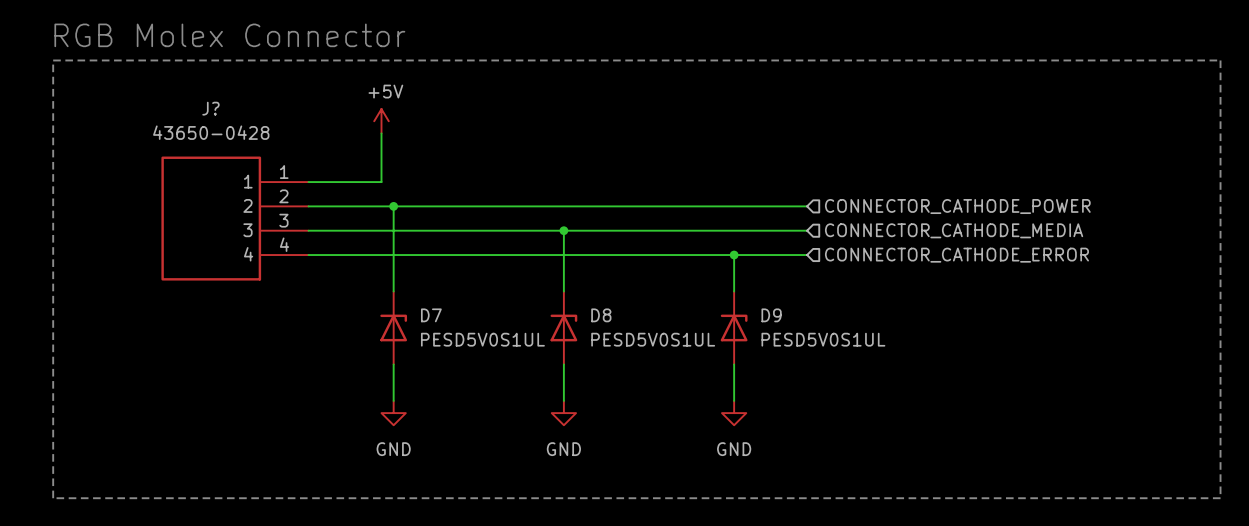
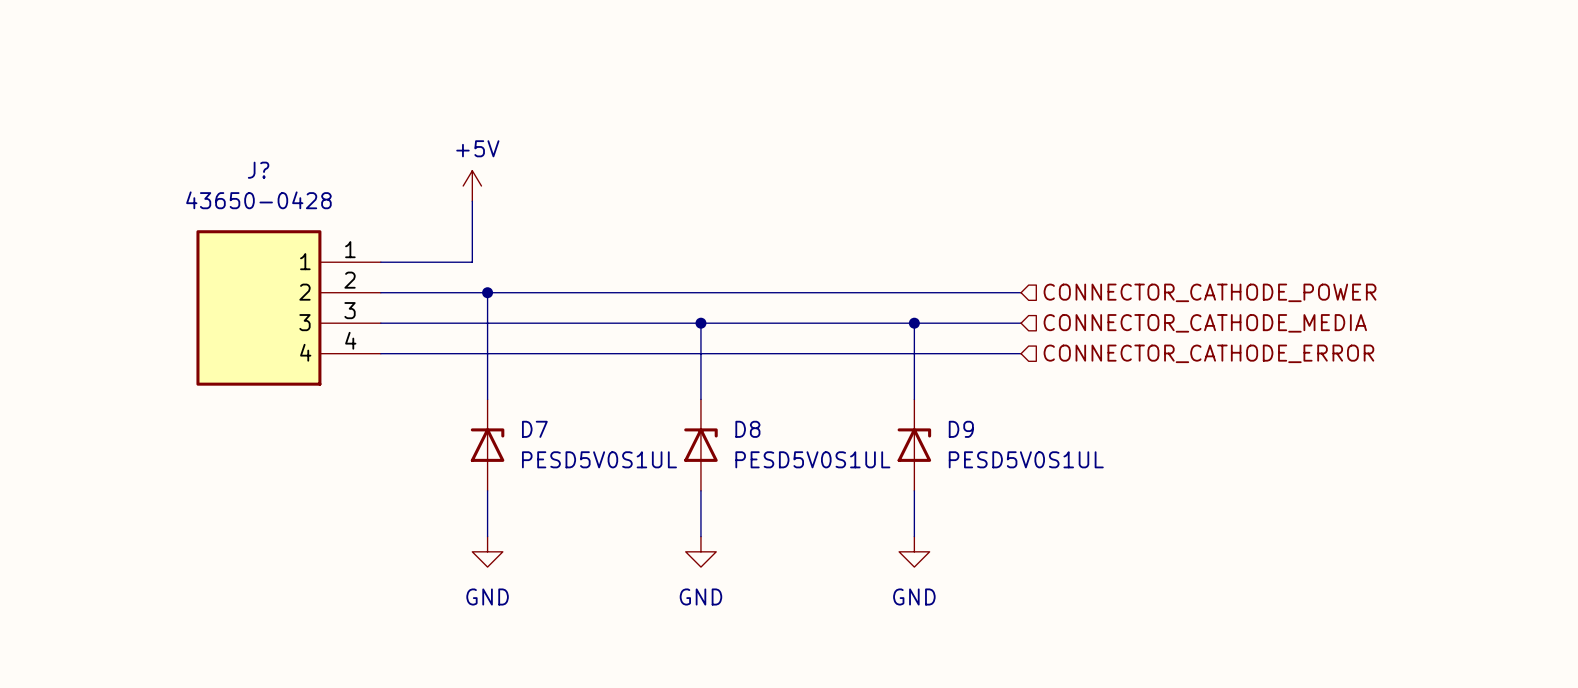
text: RGB Molex Connector (229, 35) -> none
line: (53, 60) (1220, 60) (1220, 498) (53, 498) (53, 60) -> none
wire: none -> (1005, 292) (1021, 292)
hierarchical label position: CONNECTOR_CATHODE_POWER (957, 206) -> CONNECTOR_CATHODE_POWER (1210, 292)
wire: none -> (914, 323) (914, 353)
wire: none -> (1005, 323) (1021, 323)
hierarchical label position: CONNECTOR_CATHODE_MEDIA (954, 230) -> CONNECTOR_CATHODE_MEDIA (1205, 323)
junction position: (734, 255) -> (914, 323)
wire: none -> (1005, 353) (1021, 353)
hierarchical label position: CONNECTOR_CATHODE_ERROR (956, 255) -> CONNECTOR_CATHODE_ERROR (1208, 353)

